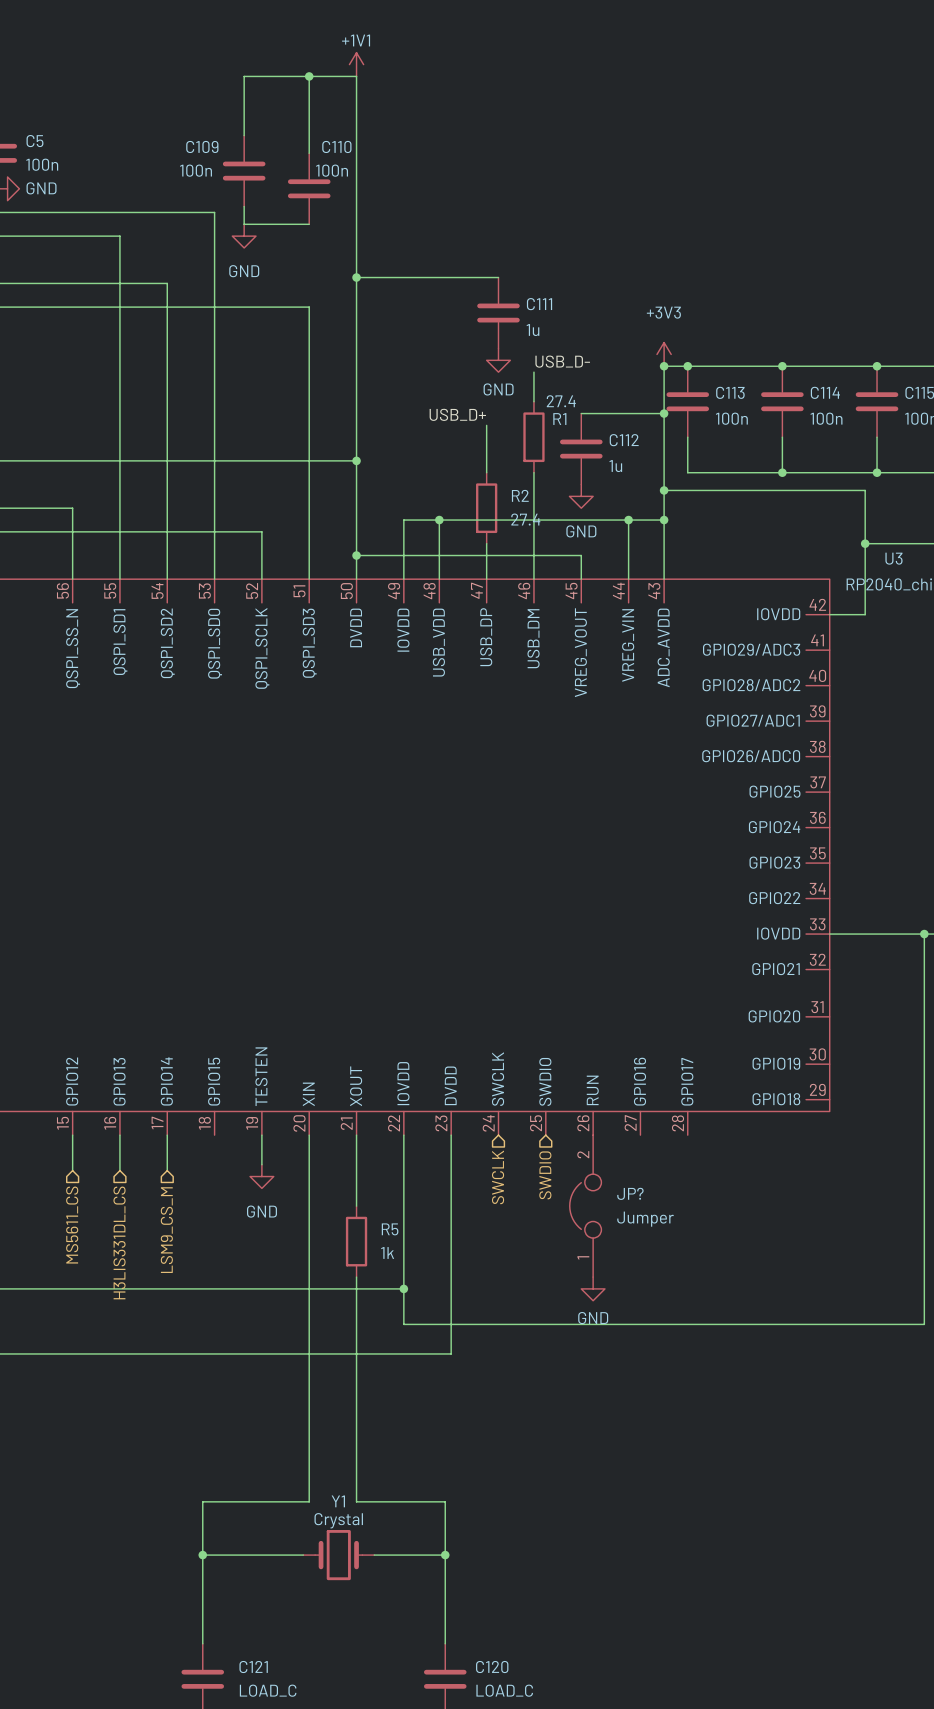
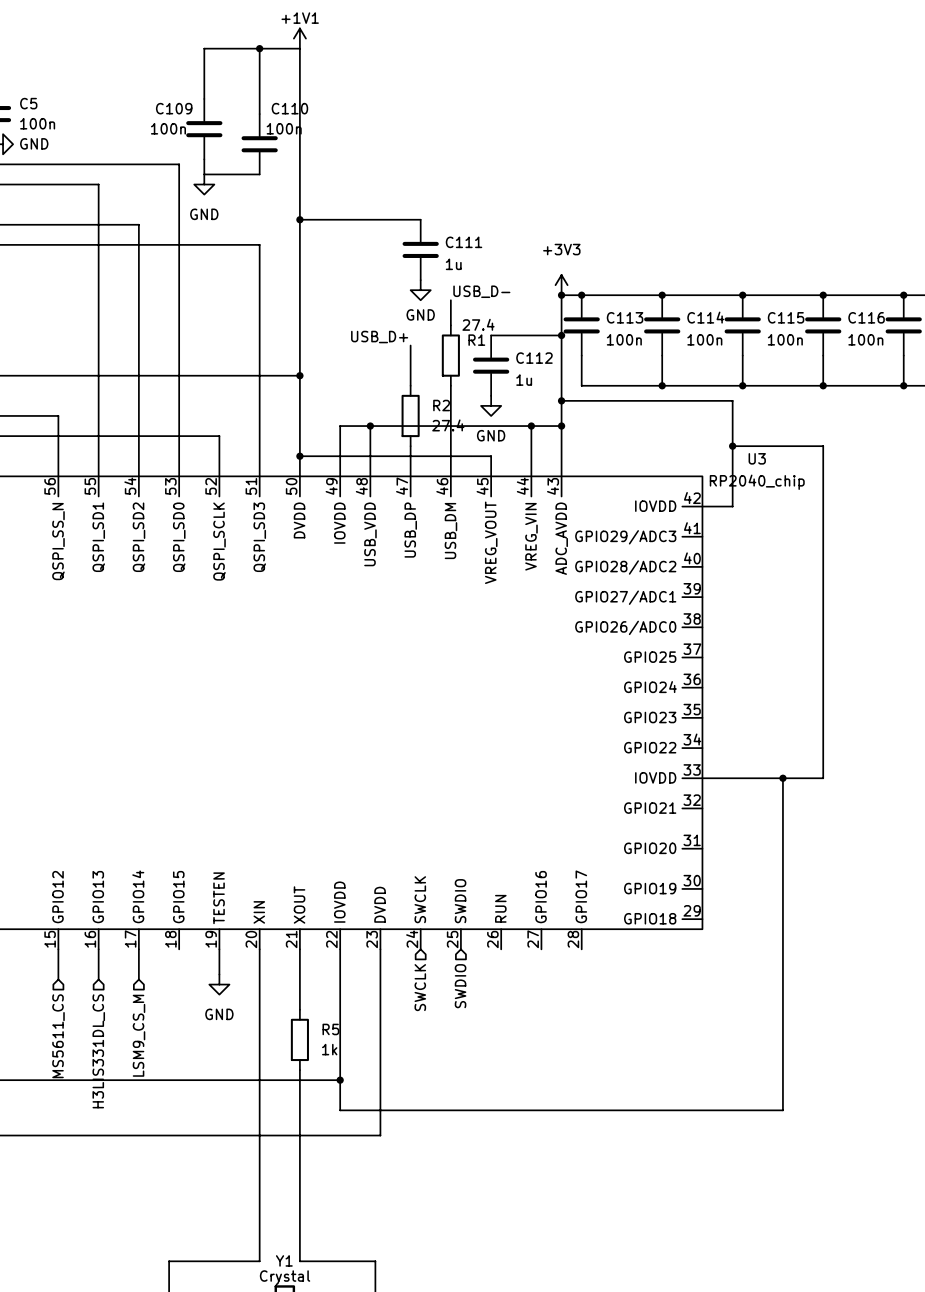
JP?: Jumper (585, 1206) -> none
power symbol: GND (593, 1288) -> none

